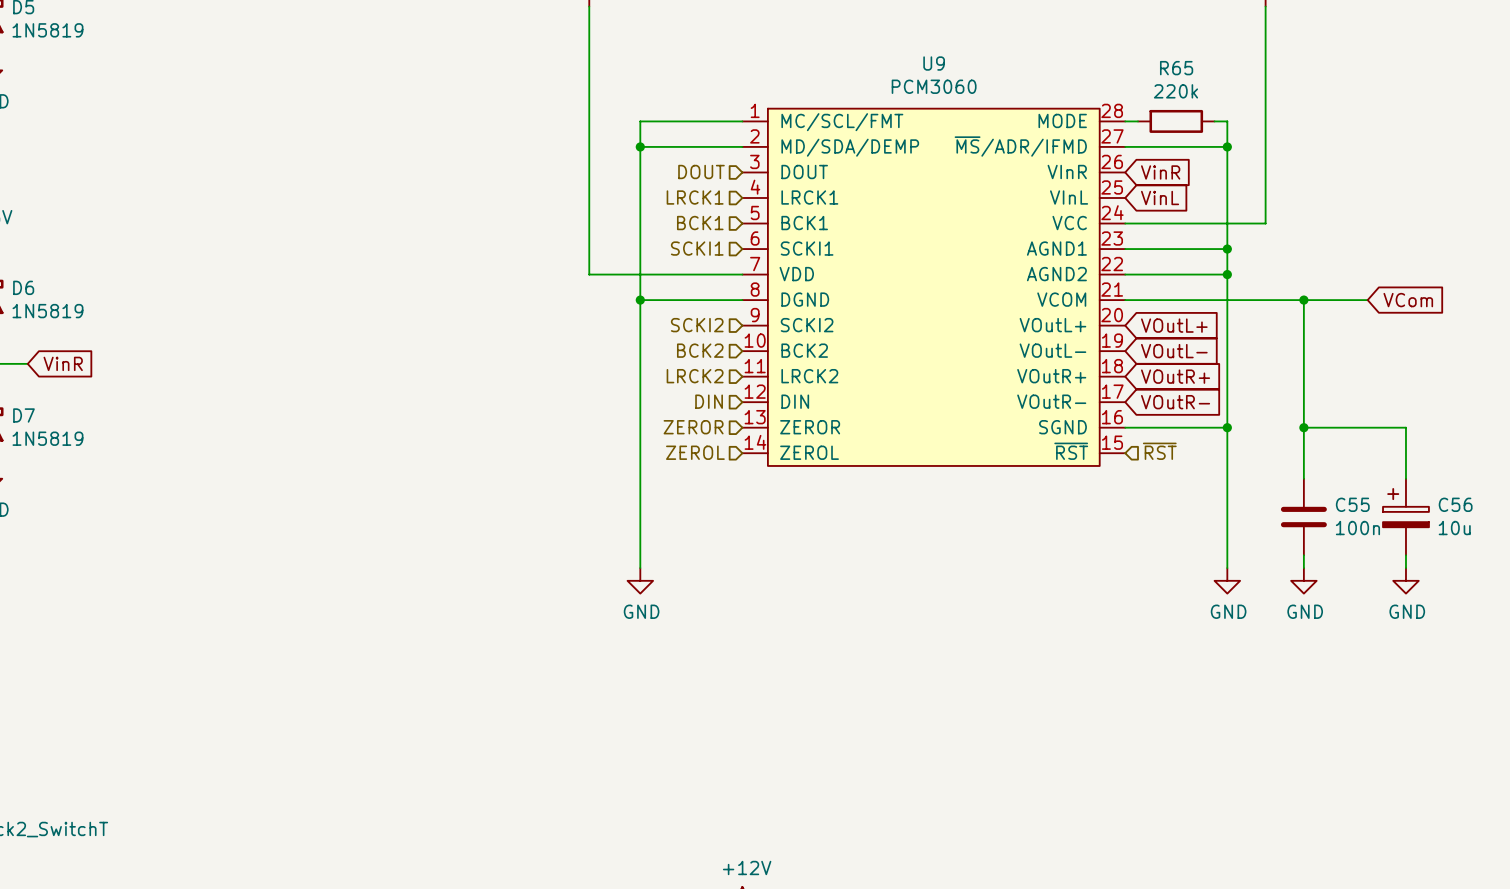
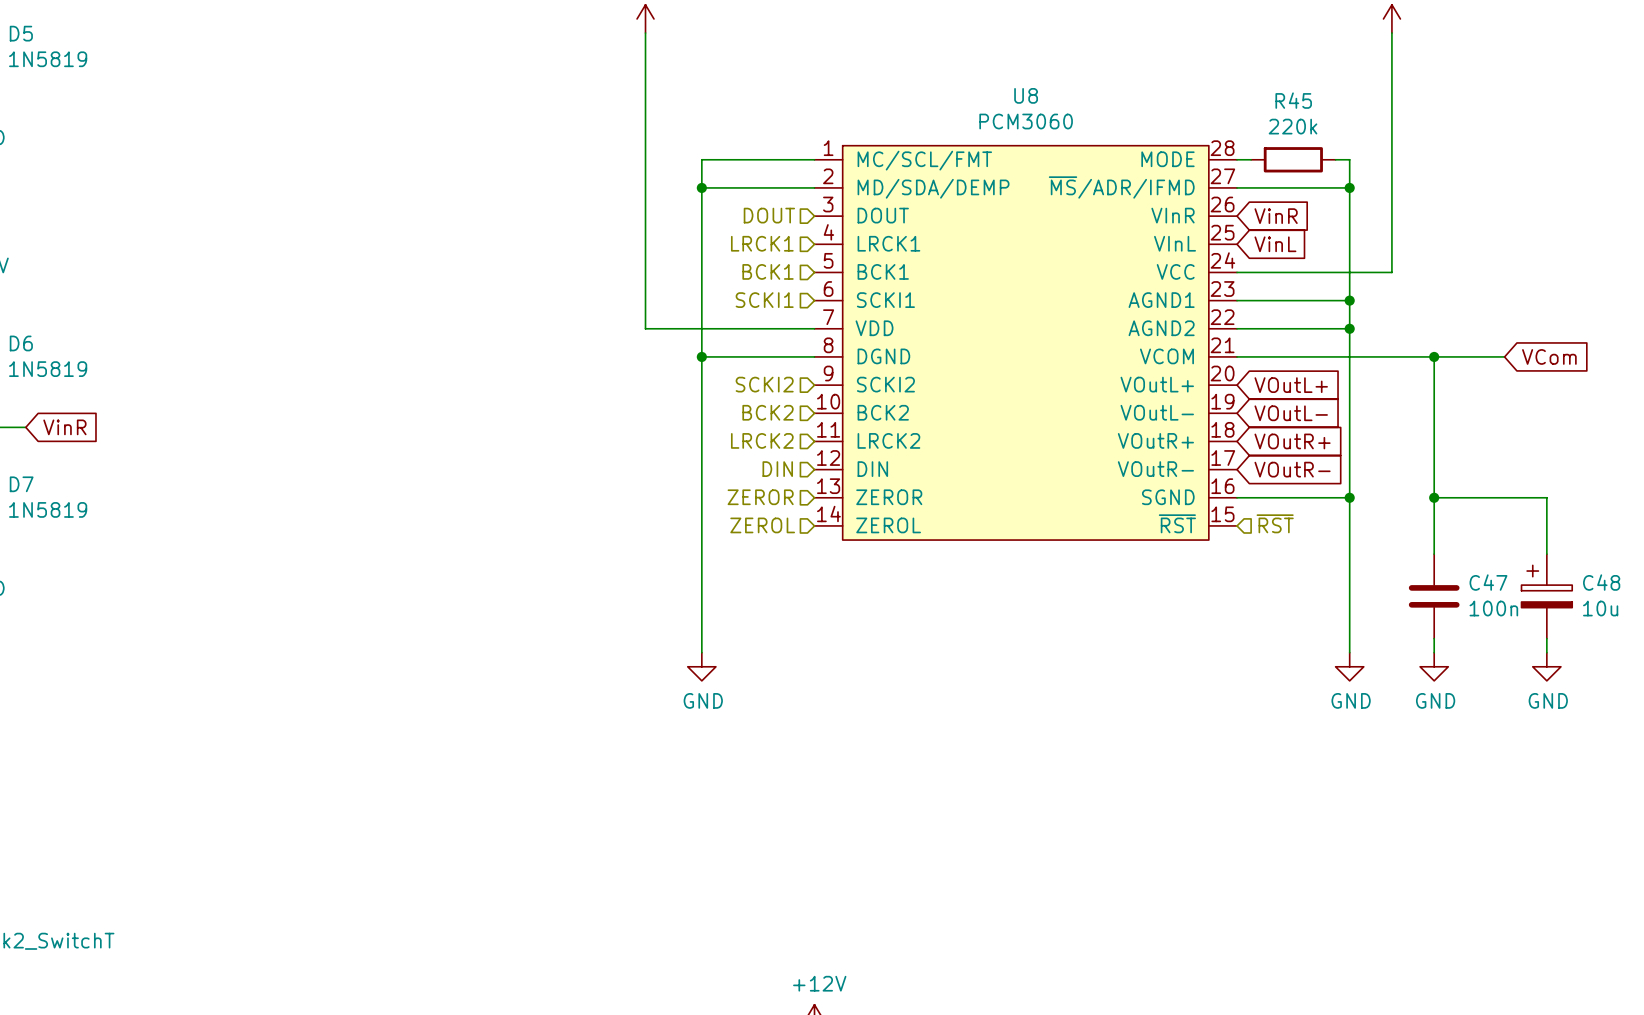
U9 name: U9 (934, 63) -> U8 (1026, 95)
R65 name: R65 (1176, 68) -> R45 (1293, 100)
C55 name: C55 (1352, 504) -> C47 (1488, 582)
C56 name: C56 (1455, 504) -> C48 (1601, 582)

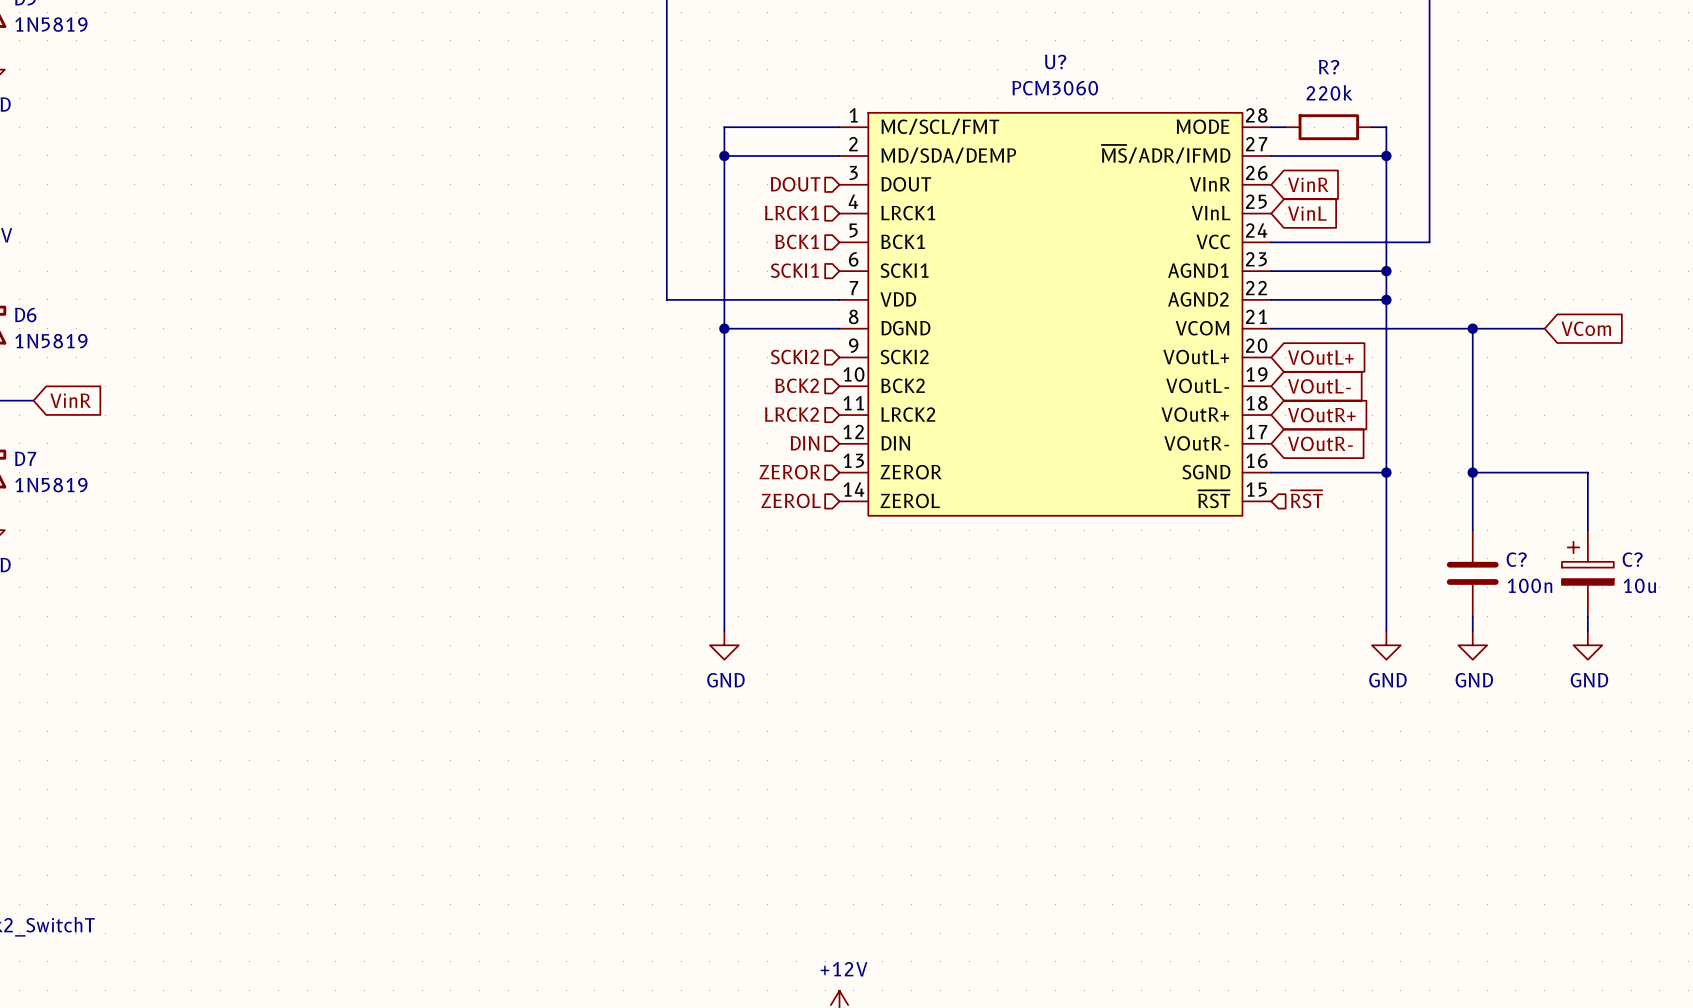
U8 name: U8 (1026, 95) -> U? (1055, 61)
R45 name: R45 (1293, 100) -> R? (1329, 67)
C47 name: C47 (1488, 582) -> C? (1516, 559)
C48 name: C48 (1601, 582) -> C? (1632, 559)

